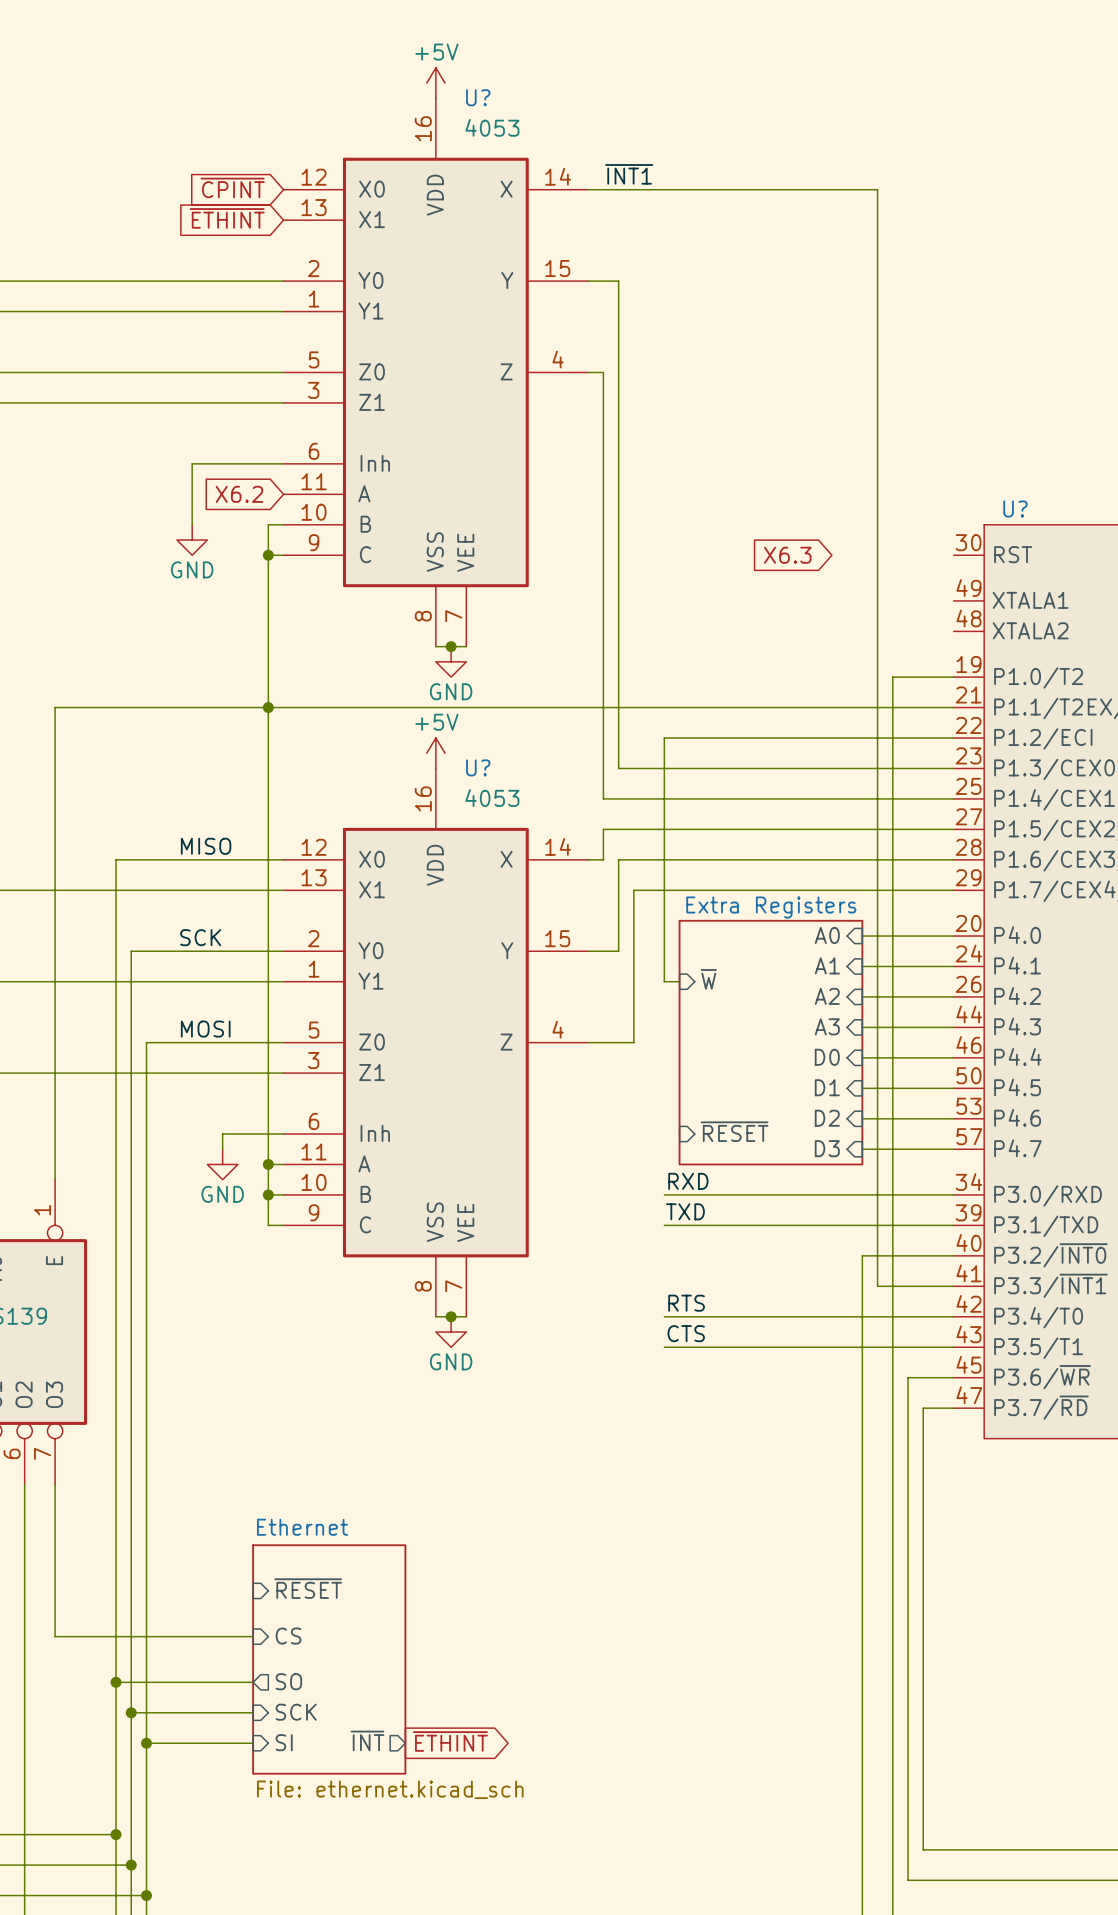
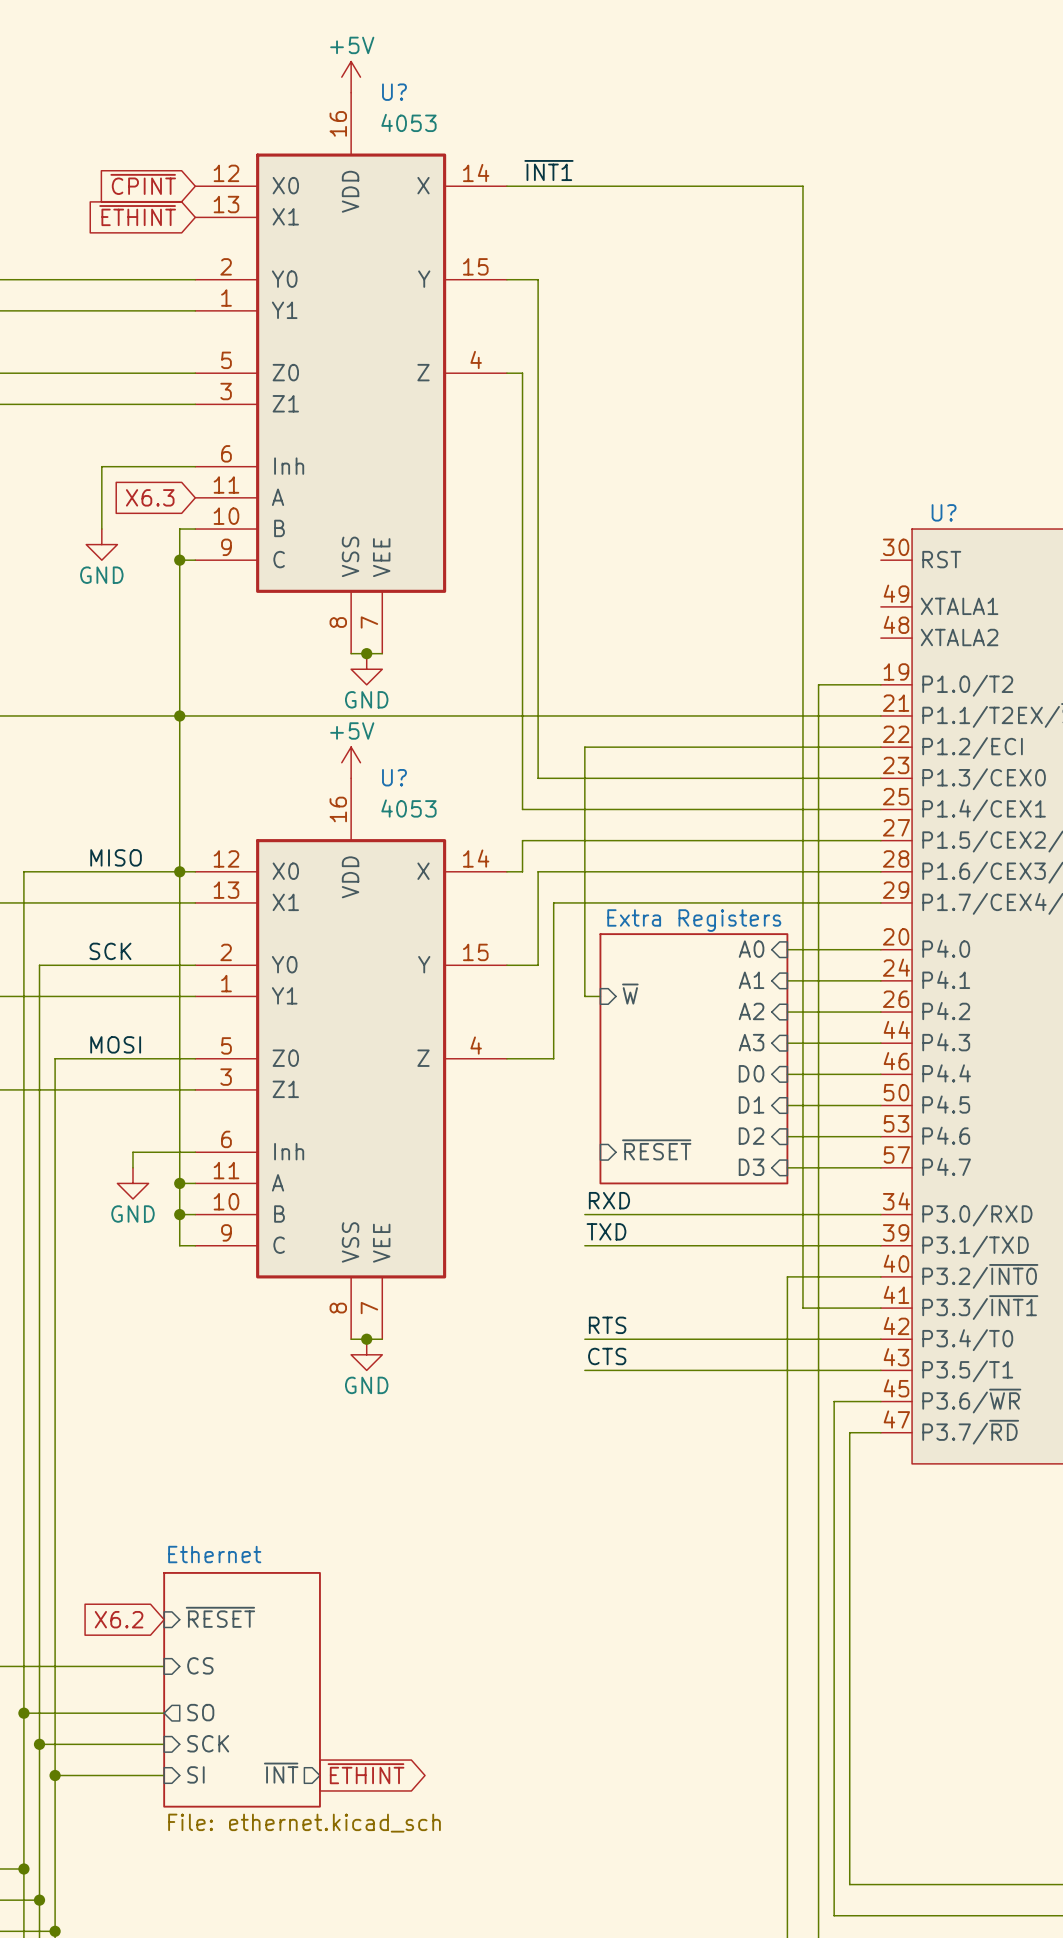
global label: X6.2 (239, 494) -> X6.3 (150, 497)
global label: X6.3 (787, 555) -> none
junction: none -> (179, 871)
global label: none -> X6.2 (119, 1619)

